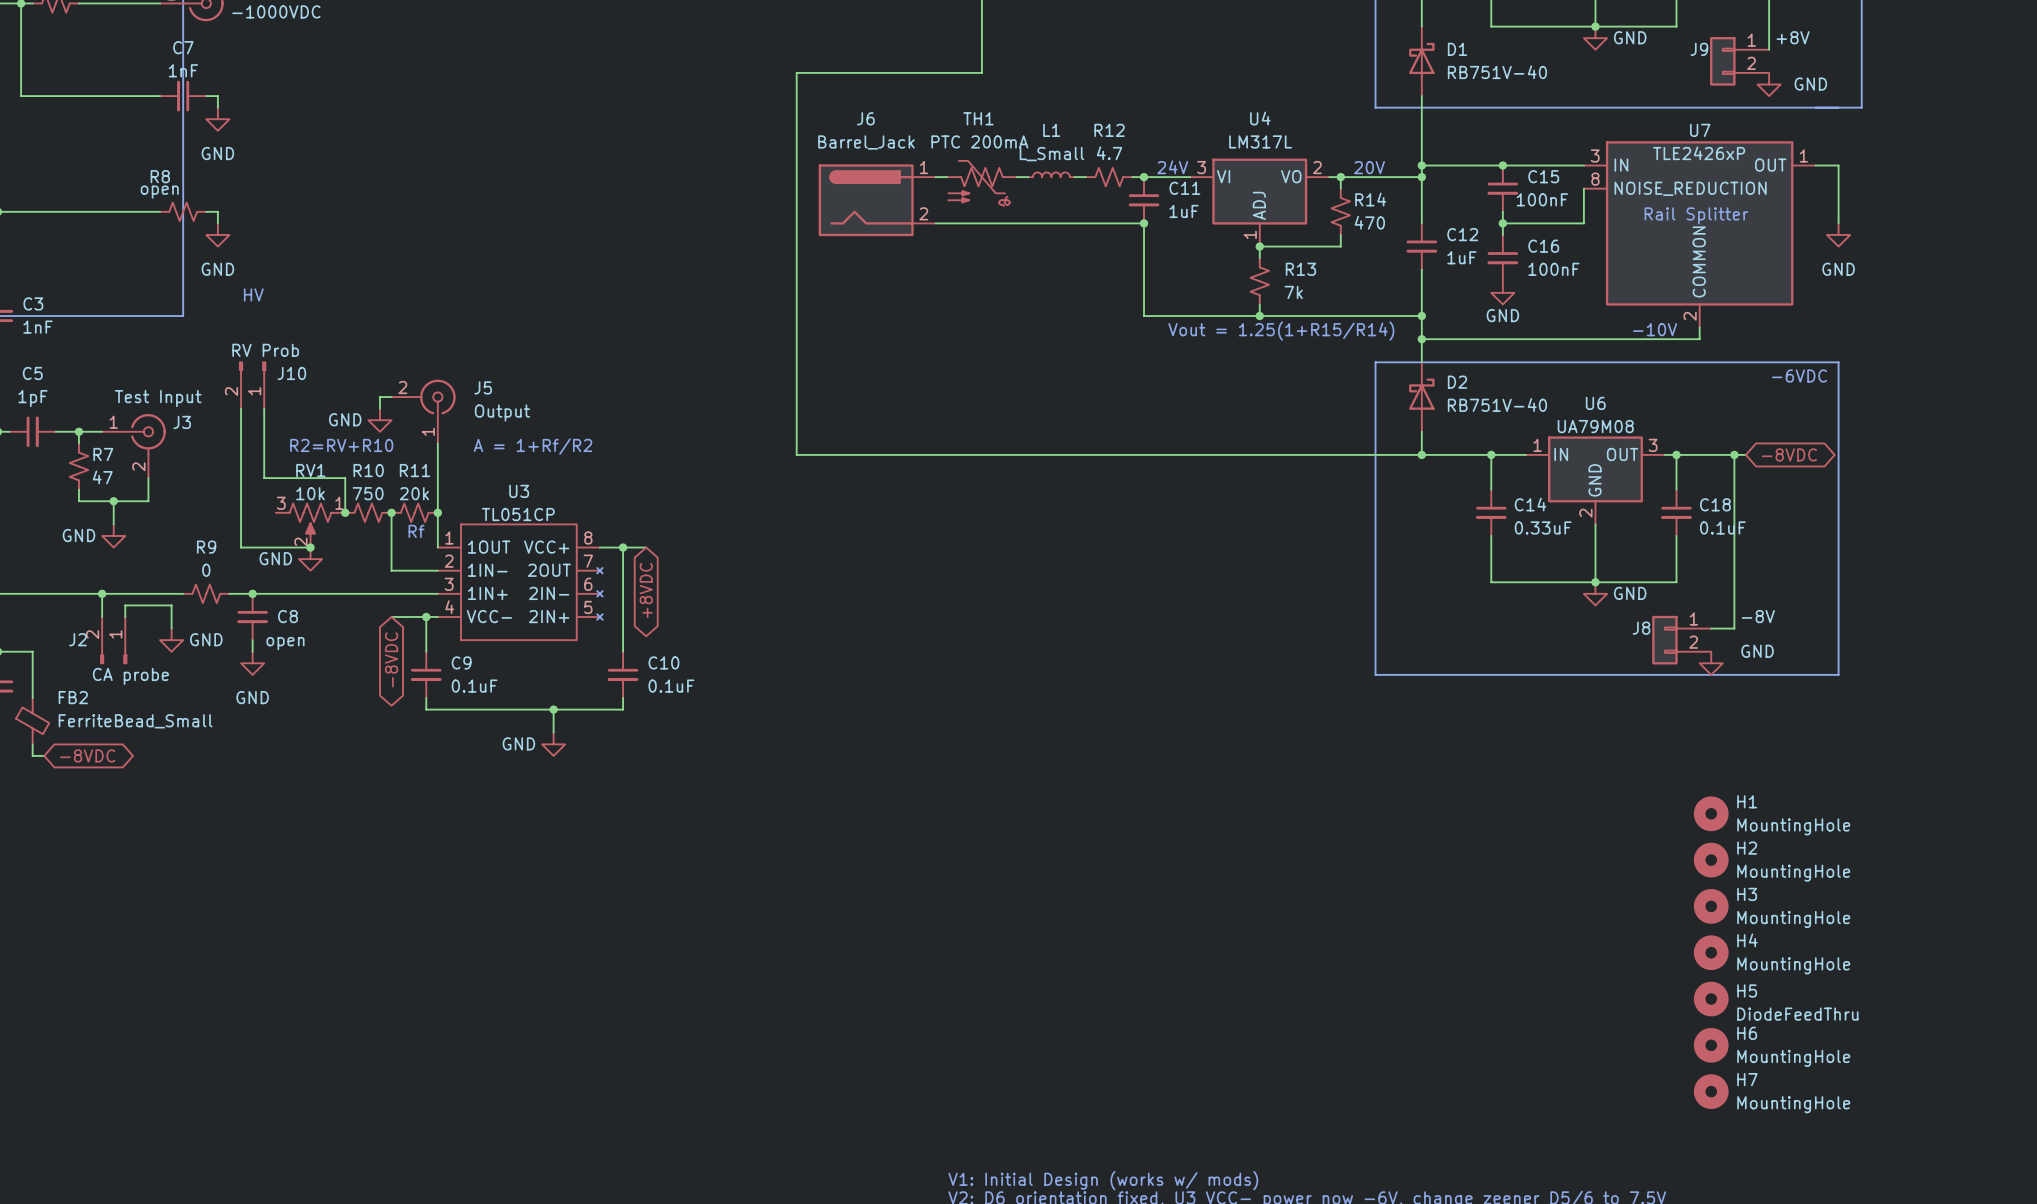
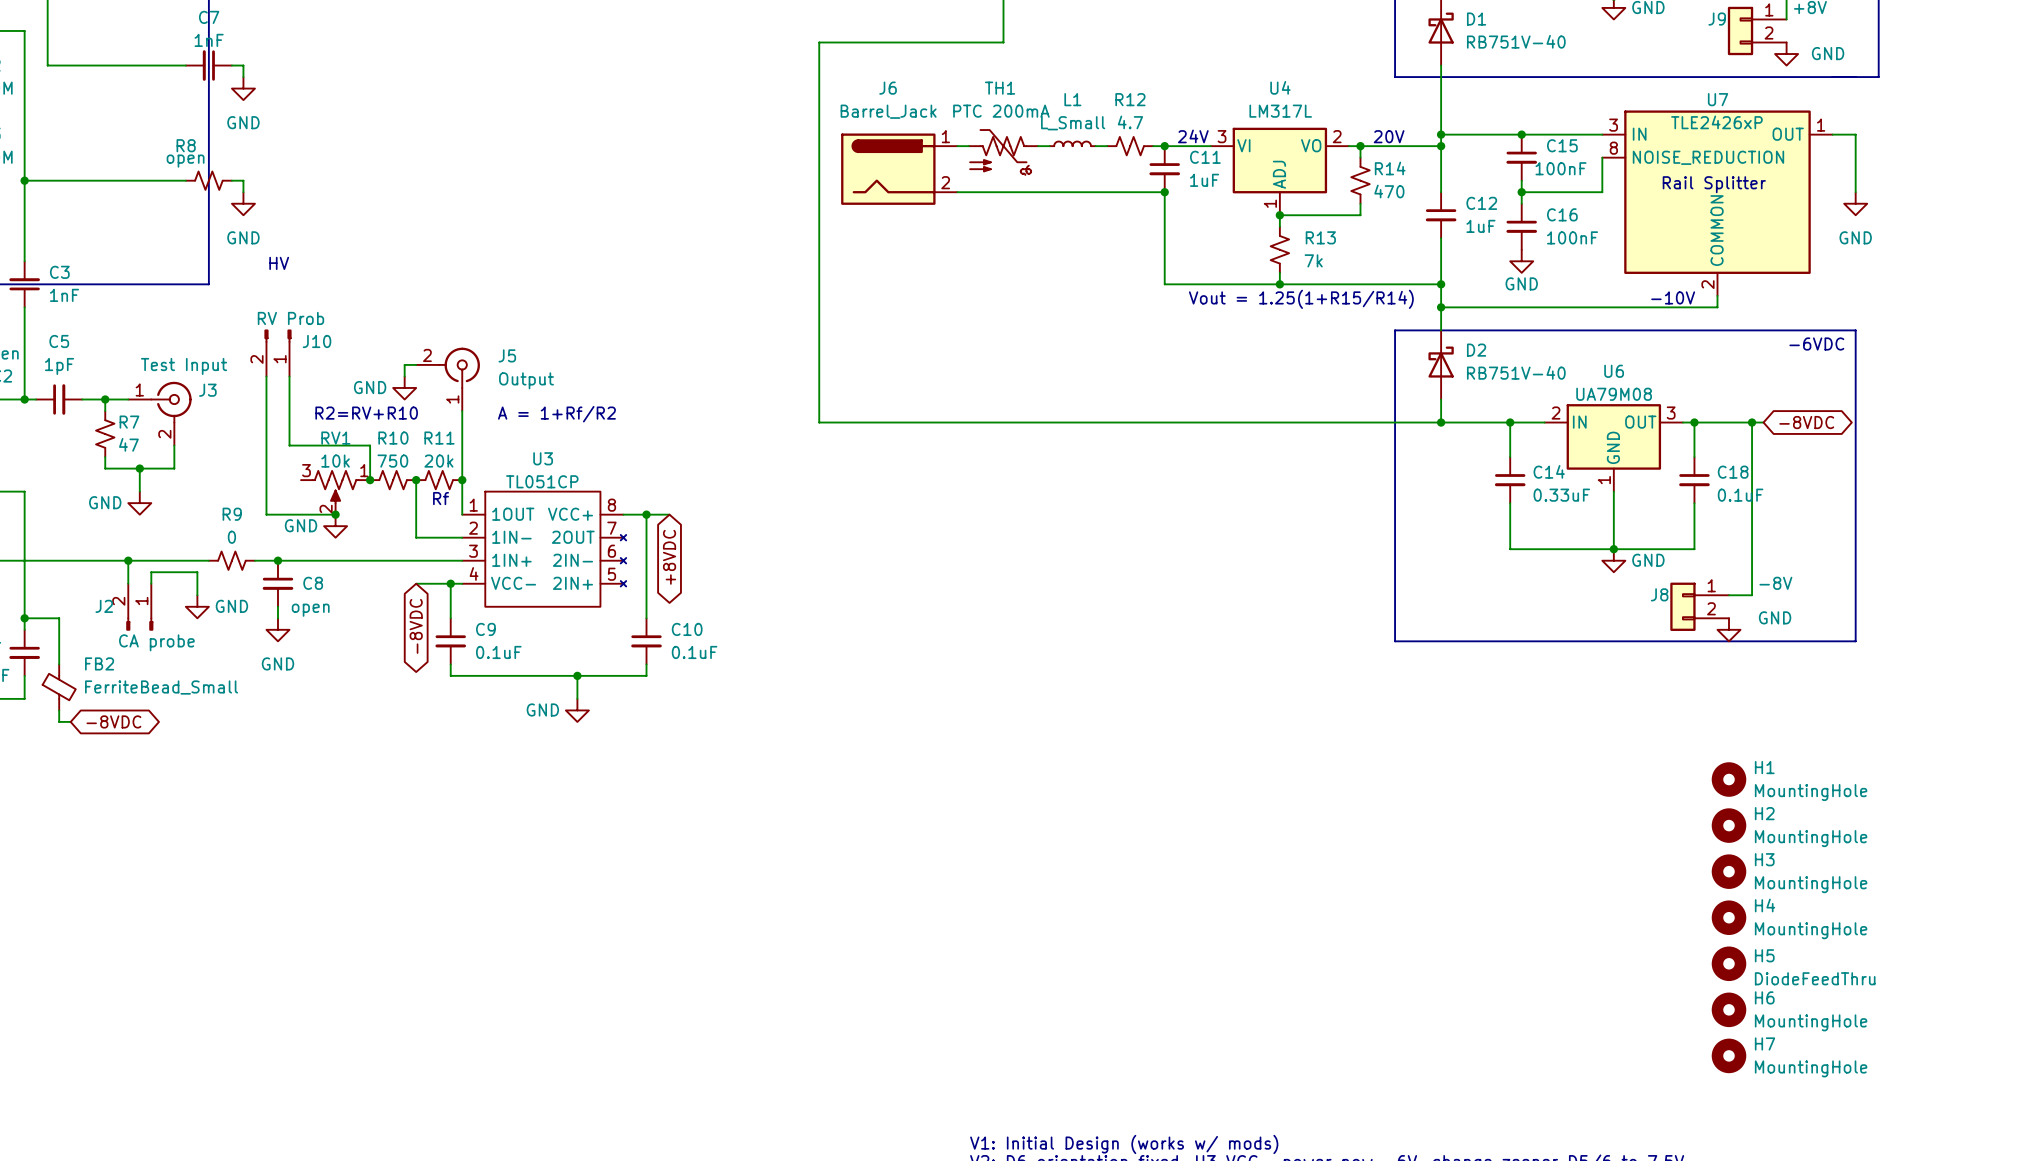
U6 pin number: 1 (1537, 445) -> 2 (1555, 413)
U6 pin number: 2 (1585, 513) -> 1 (1604, 480)

